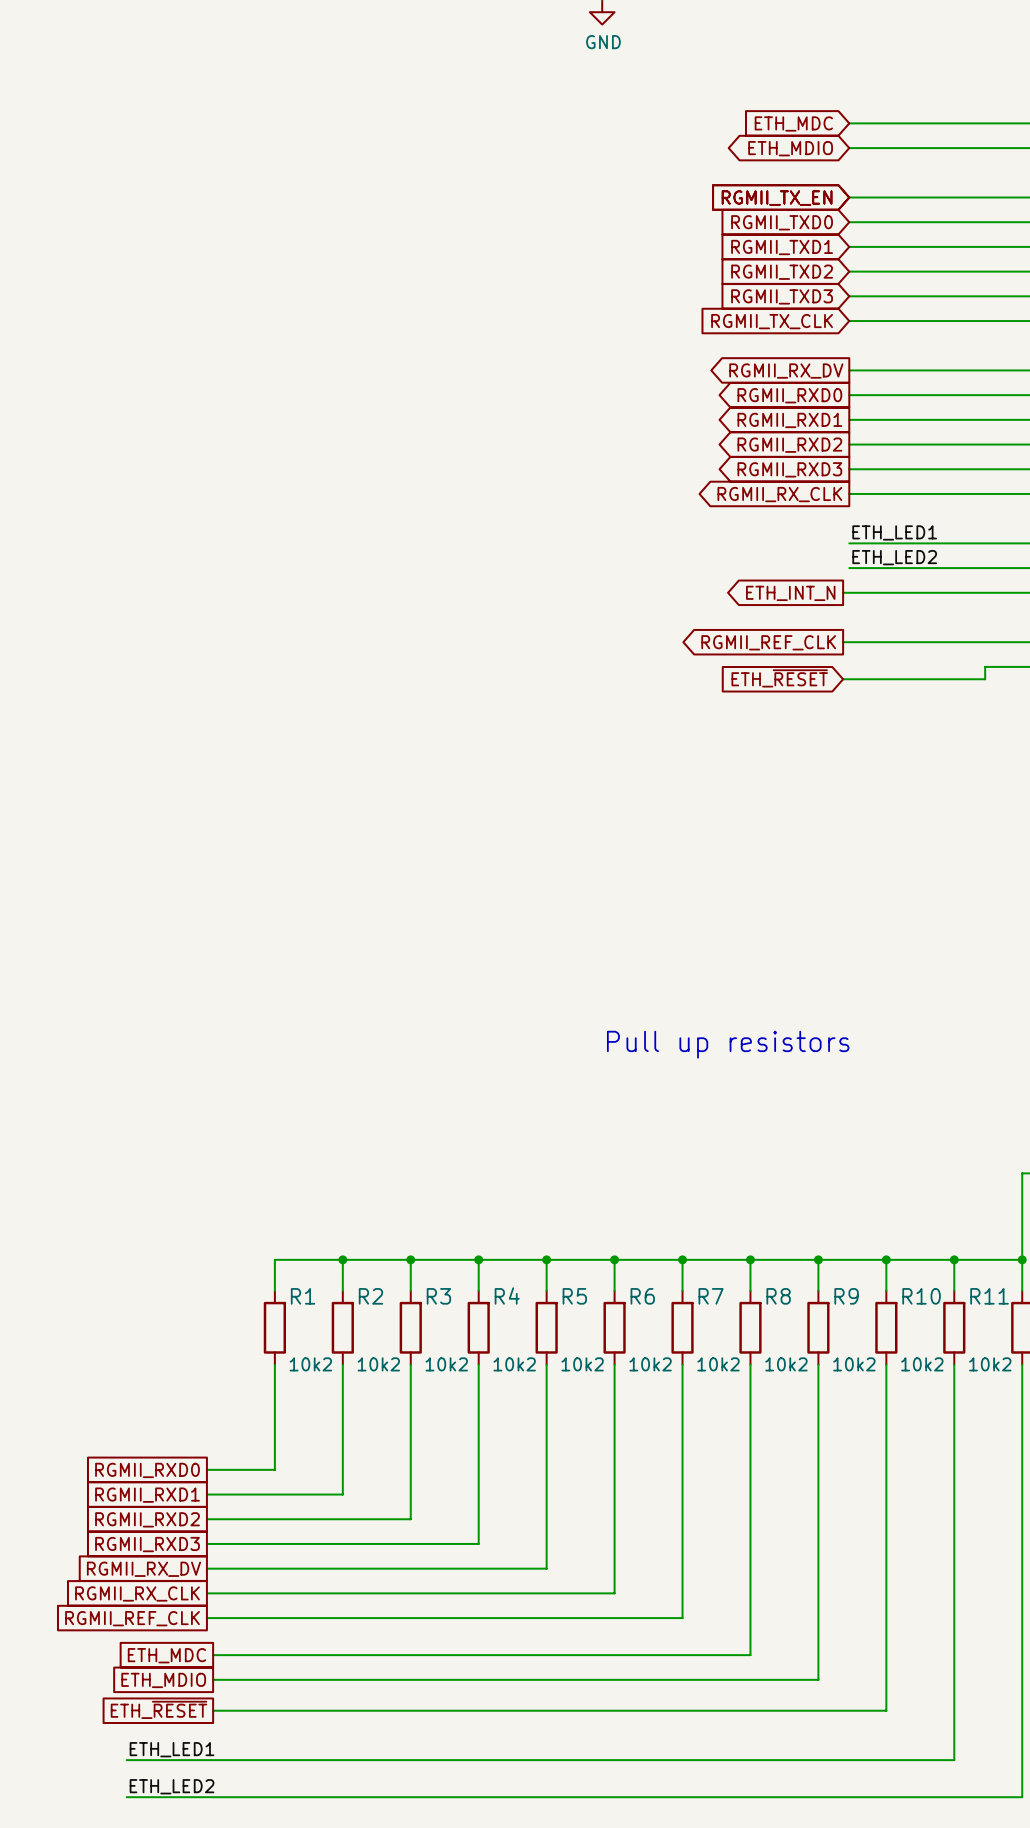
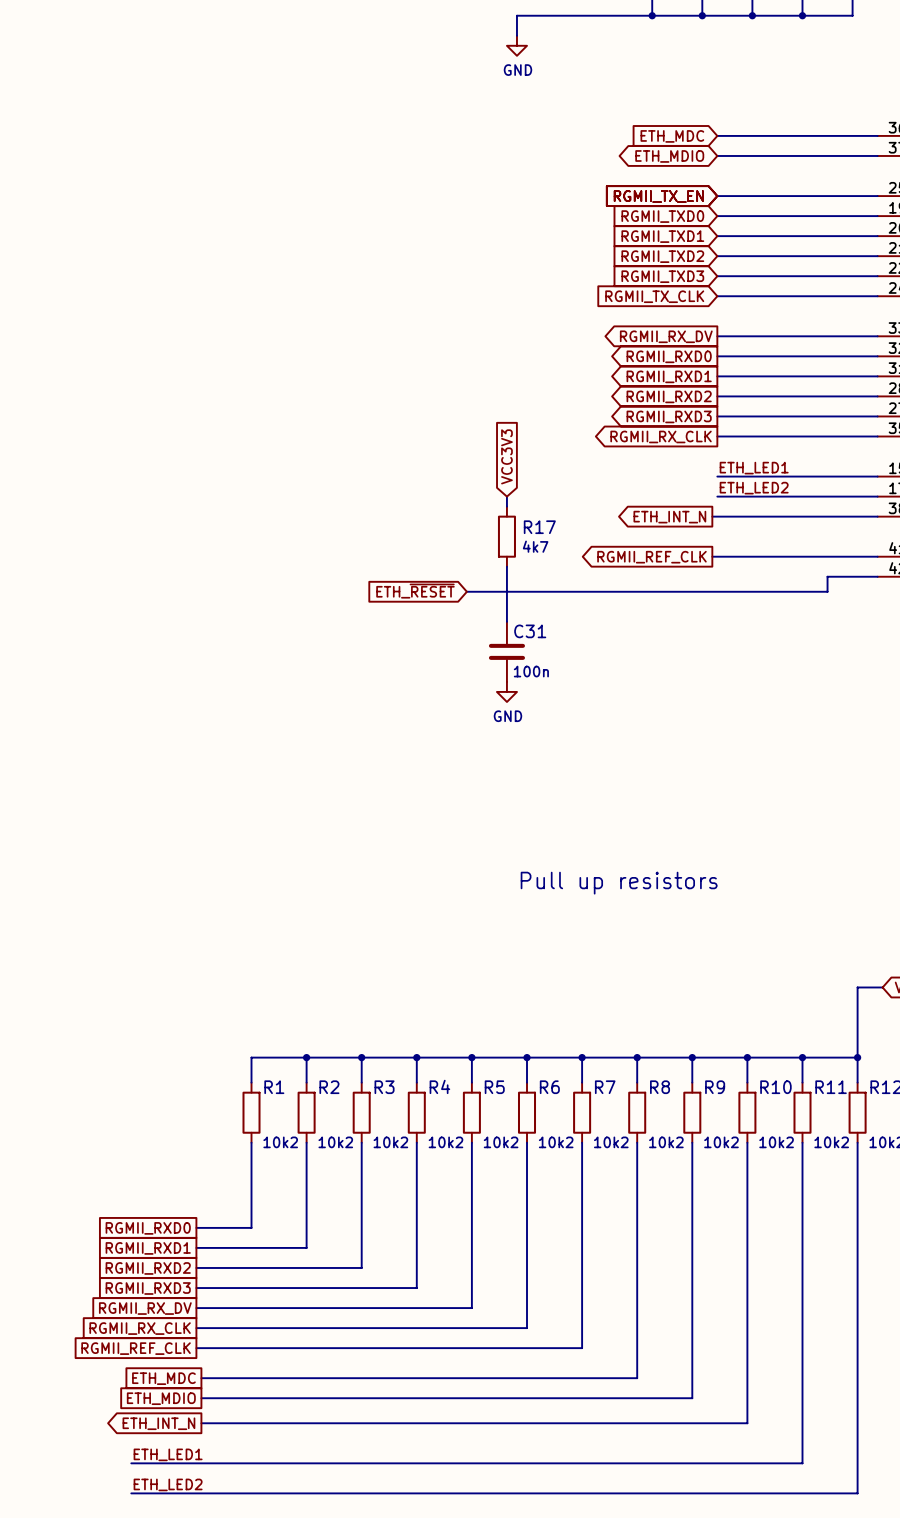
global label: none -> VCC3V3 (506, 456)
wire: none -> (506, 496) (506, 506)
R17: none -> (506, 536)
wire: none -> (506, 566) (506, 621)
global label: ETH_~{RESET} (779, 678) -> none
wire: (843, 679) (985, 679) -> (466, 591) (827, 591) (827, 586)
global label: none -> ETH_~{RESET} (415, 591)
C31: none -> (506, 651)
power symbol: none -> GND (506, 691)
global label shape: passive (158, 1709) -> output (158, 1423)
global label: ETH_~{RESET} (158, 1709) -> ETH_INT_N (158, 1423)

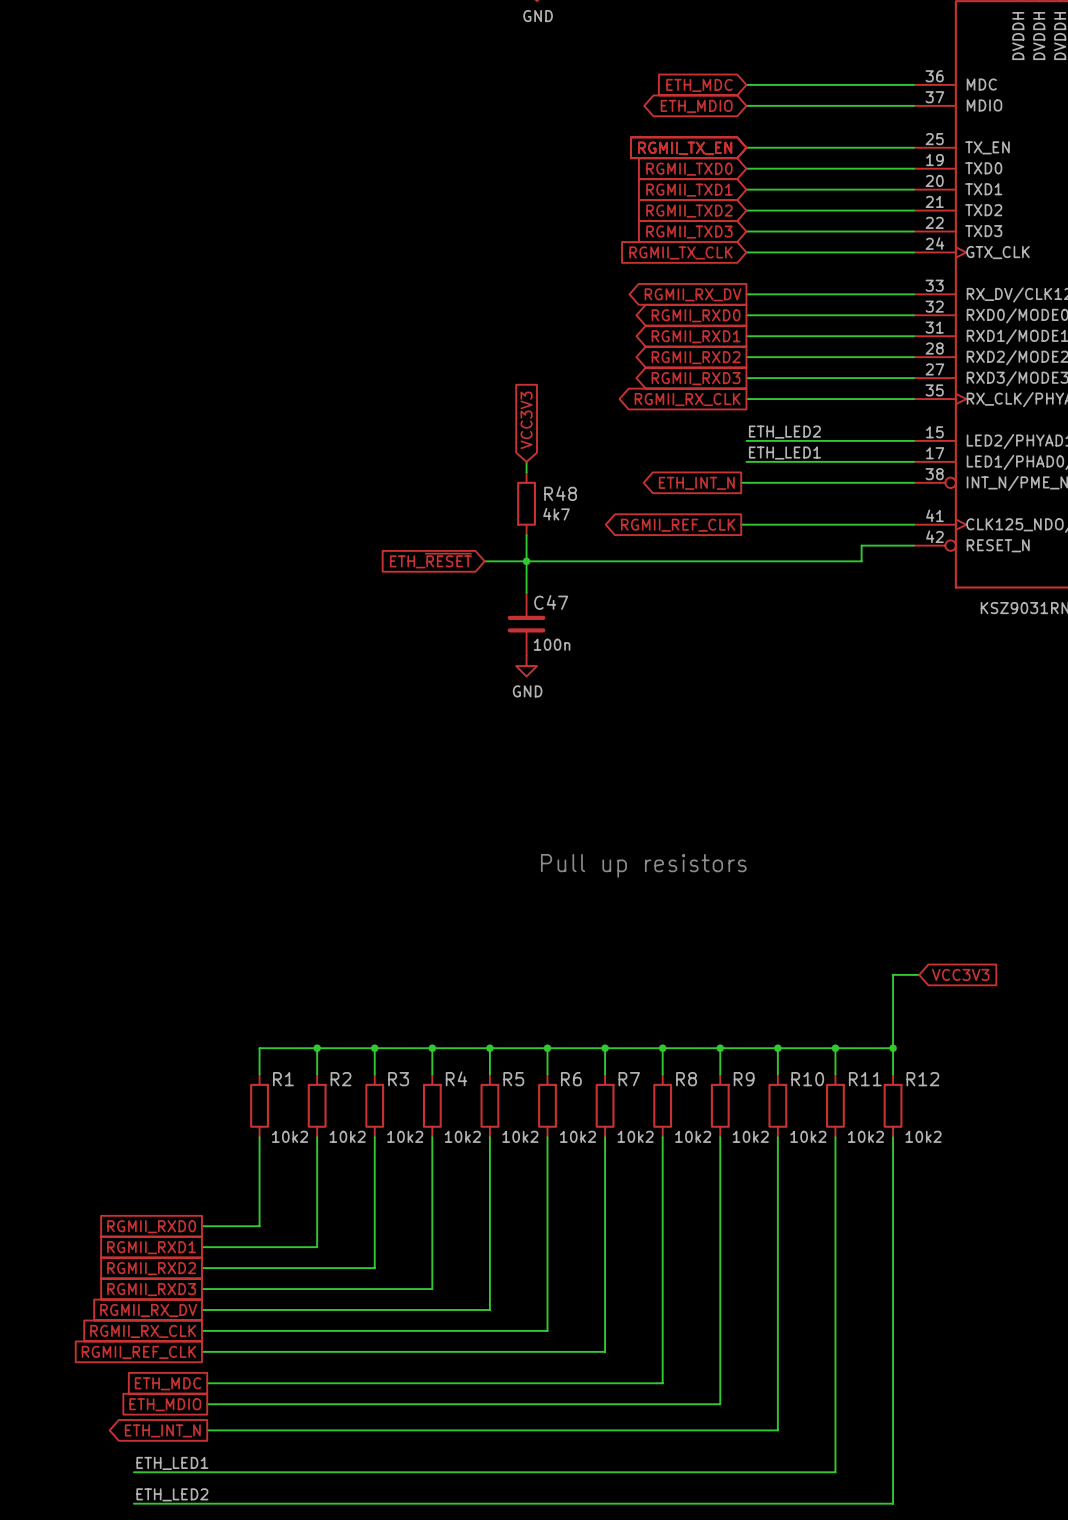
label: ETH_LED1 (754, 468) -> ETH_LED2 (784, 432)
label: ETH_LED2 (754, 488) -> ETH_LED1 (784, 453)
R17 name: R17 (539, 527) -> R48 (560, 493)
junction: none -> (526, 561)
C31 name: C31 (530, 631) -> C47 (551, 602)

